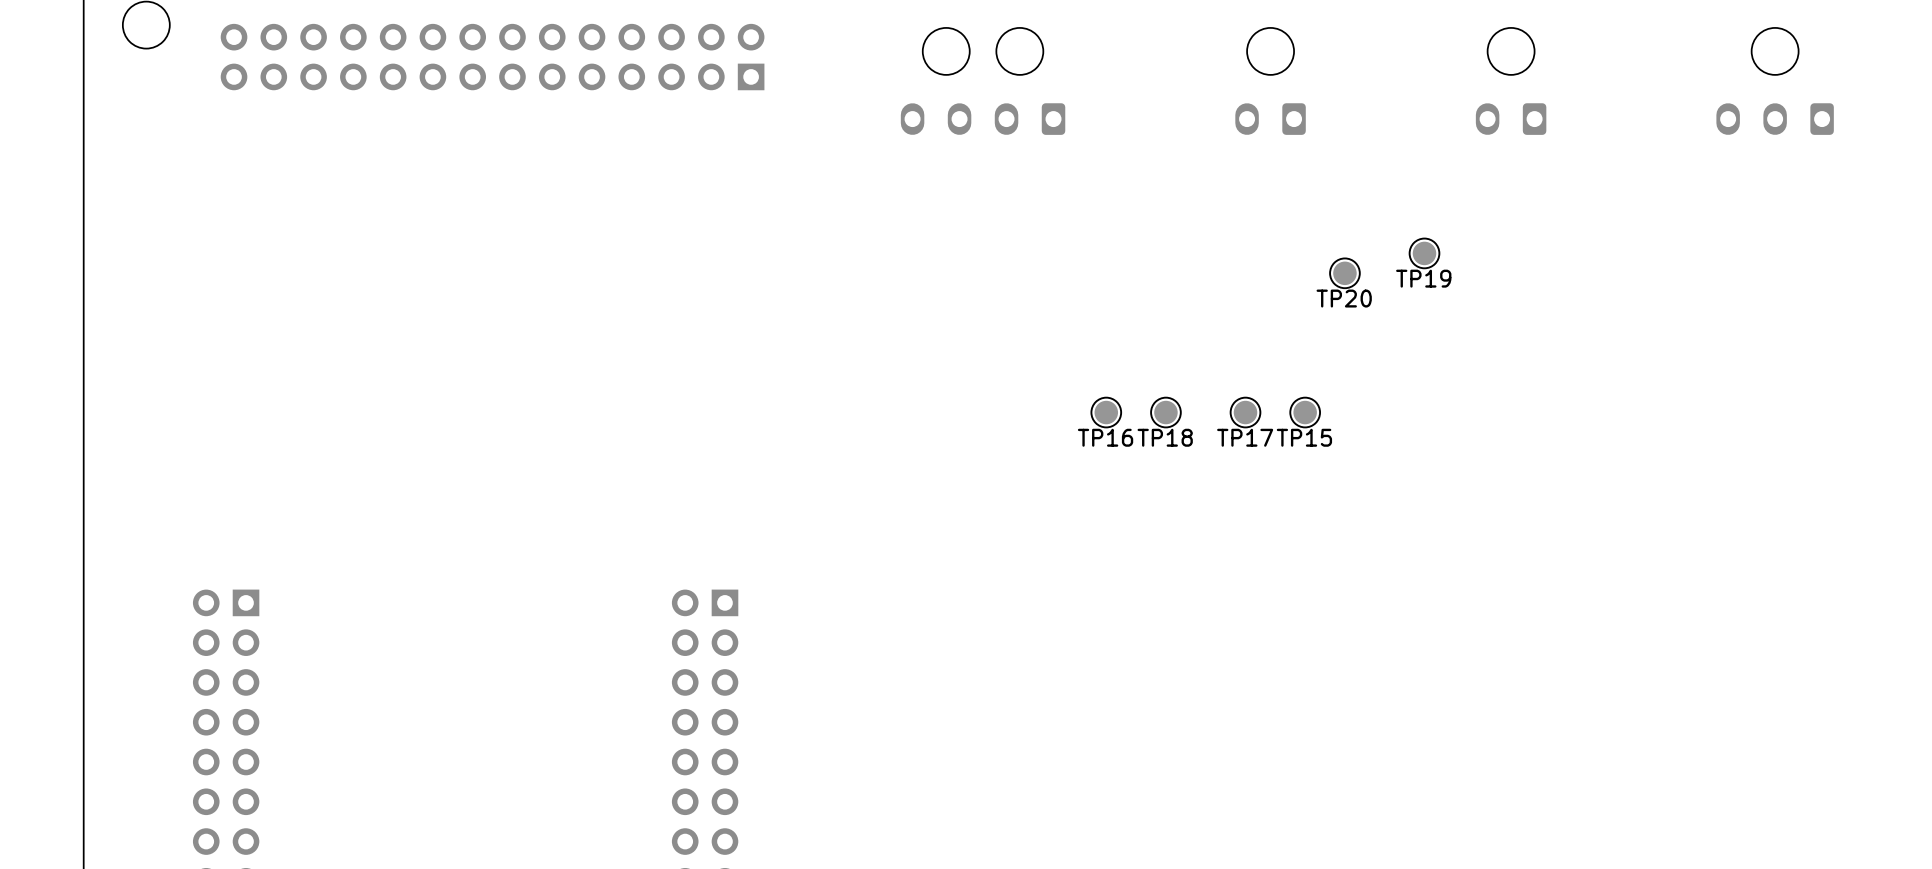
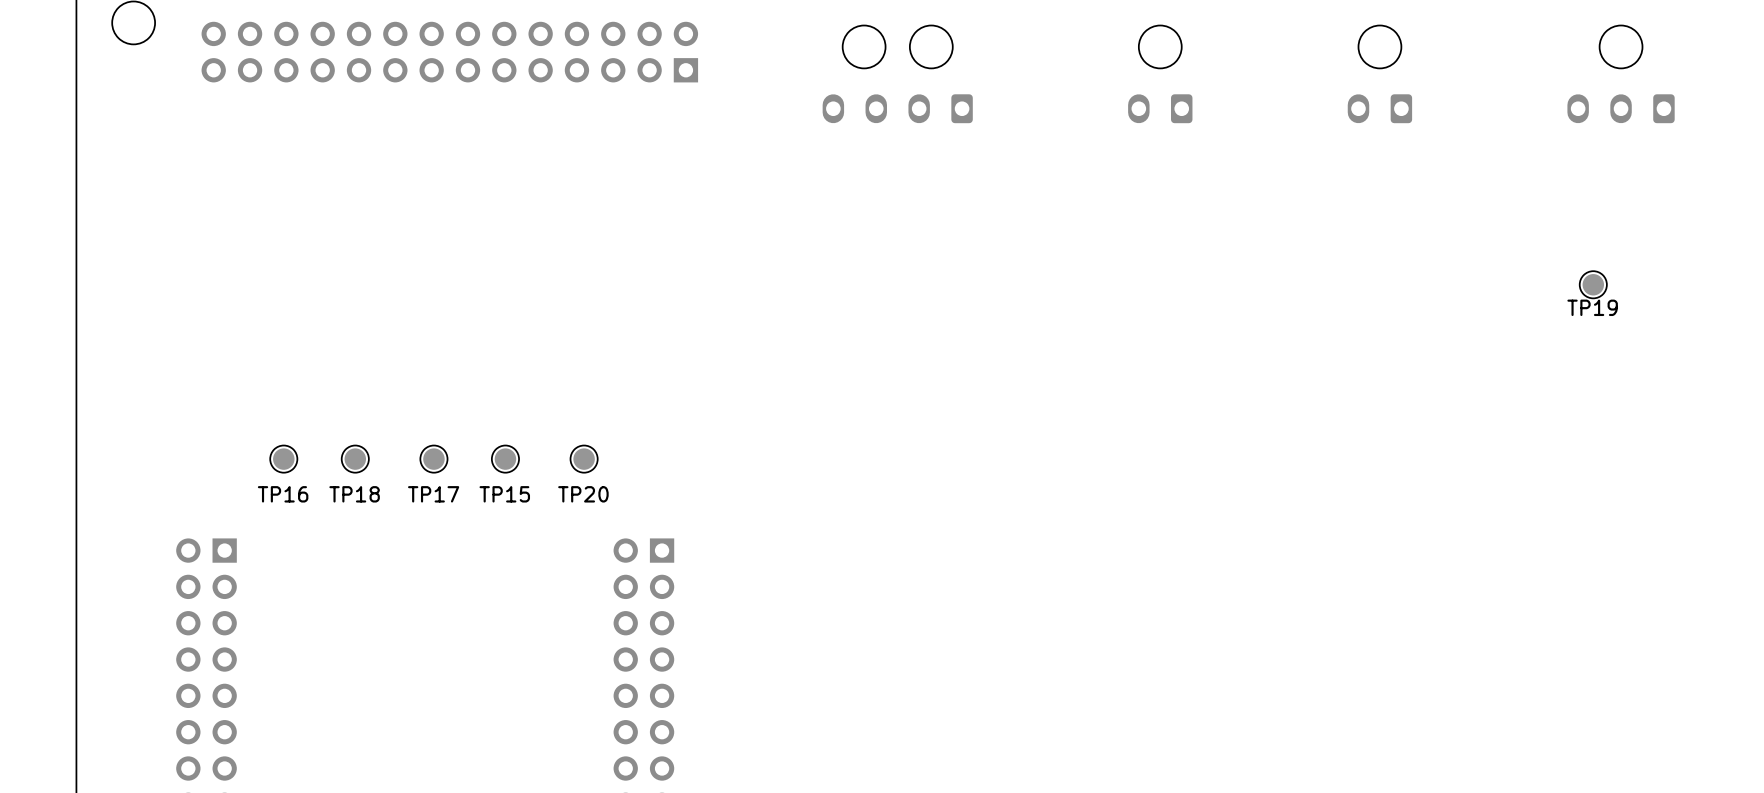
TP19 position: (1424, 253) -> (1593, 284)
TP20 position: (1344, 273) -> (584, 459)
TP20 name position: TP20 (1344, 298) -> TP20 (583, 494)
TP16 position: (1106, 412) -> (283, 459)
TP18 position: (1165, 412) -> (355, 459)
TP17 position: (1245, 412) -> (433, 459)
TP15 position: (1305, 412) -> (505, 459)
TP16 name position: TP16 (1105, 437) -> TP16 (283, 494)
TP18 name position: TP18 (1165, 437) -> TP18 (354, 494)
TP17 name position: TP17 (1245, 437) -> TP17 (433, 494)
TP15 name position: TP15 (1304, 437) -> TP15 (504, 494)

